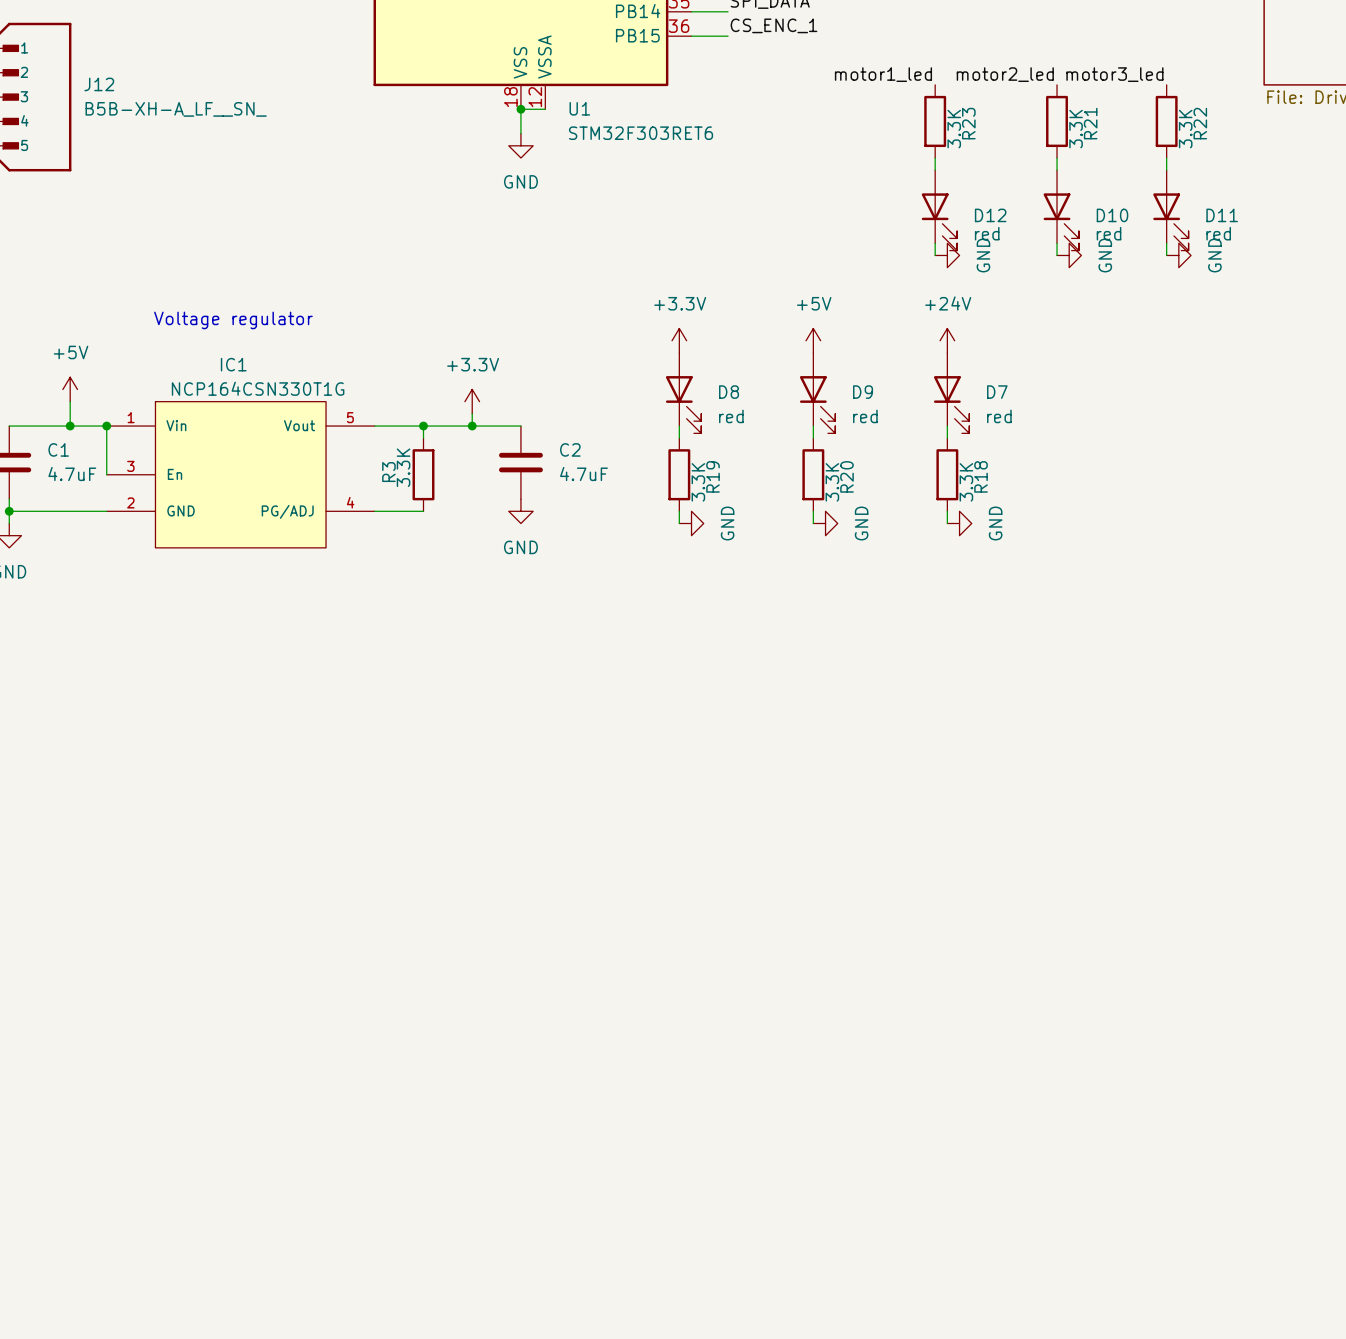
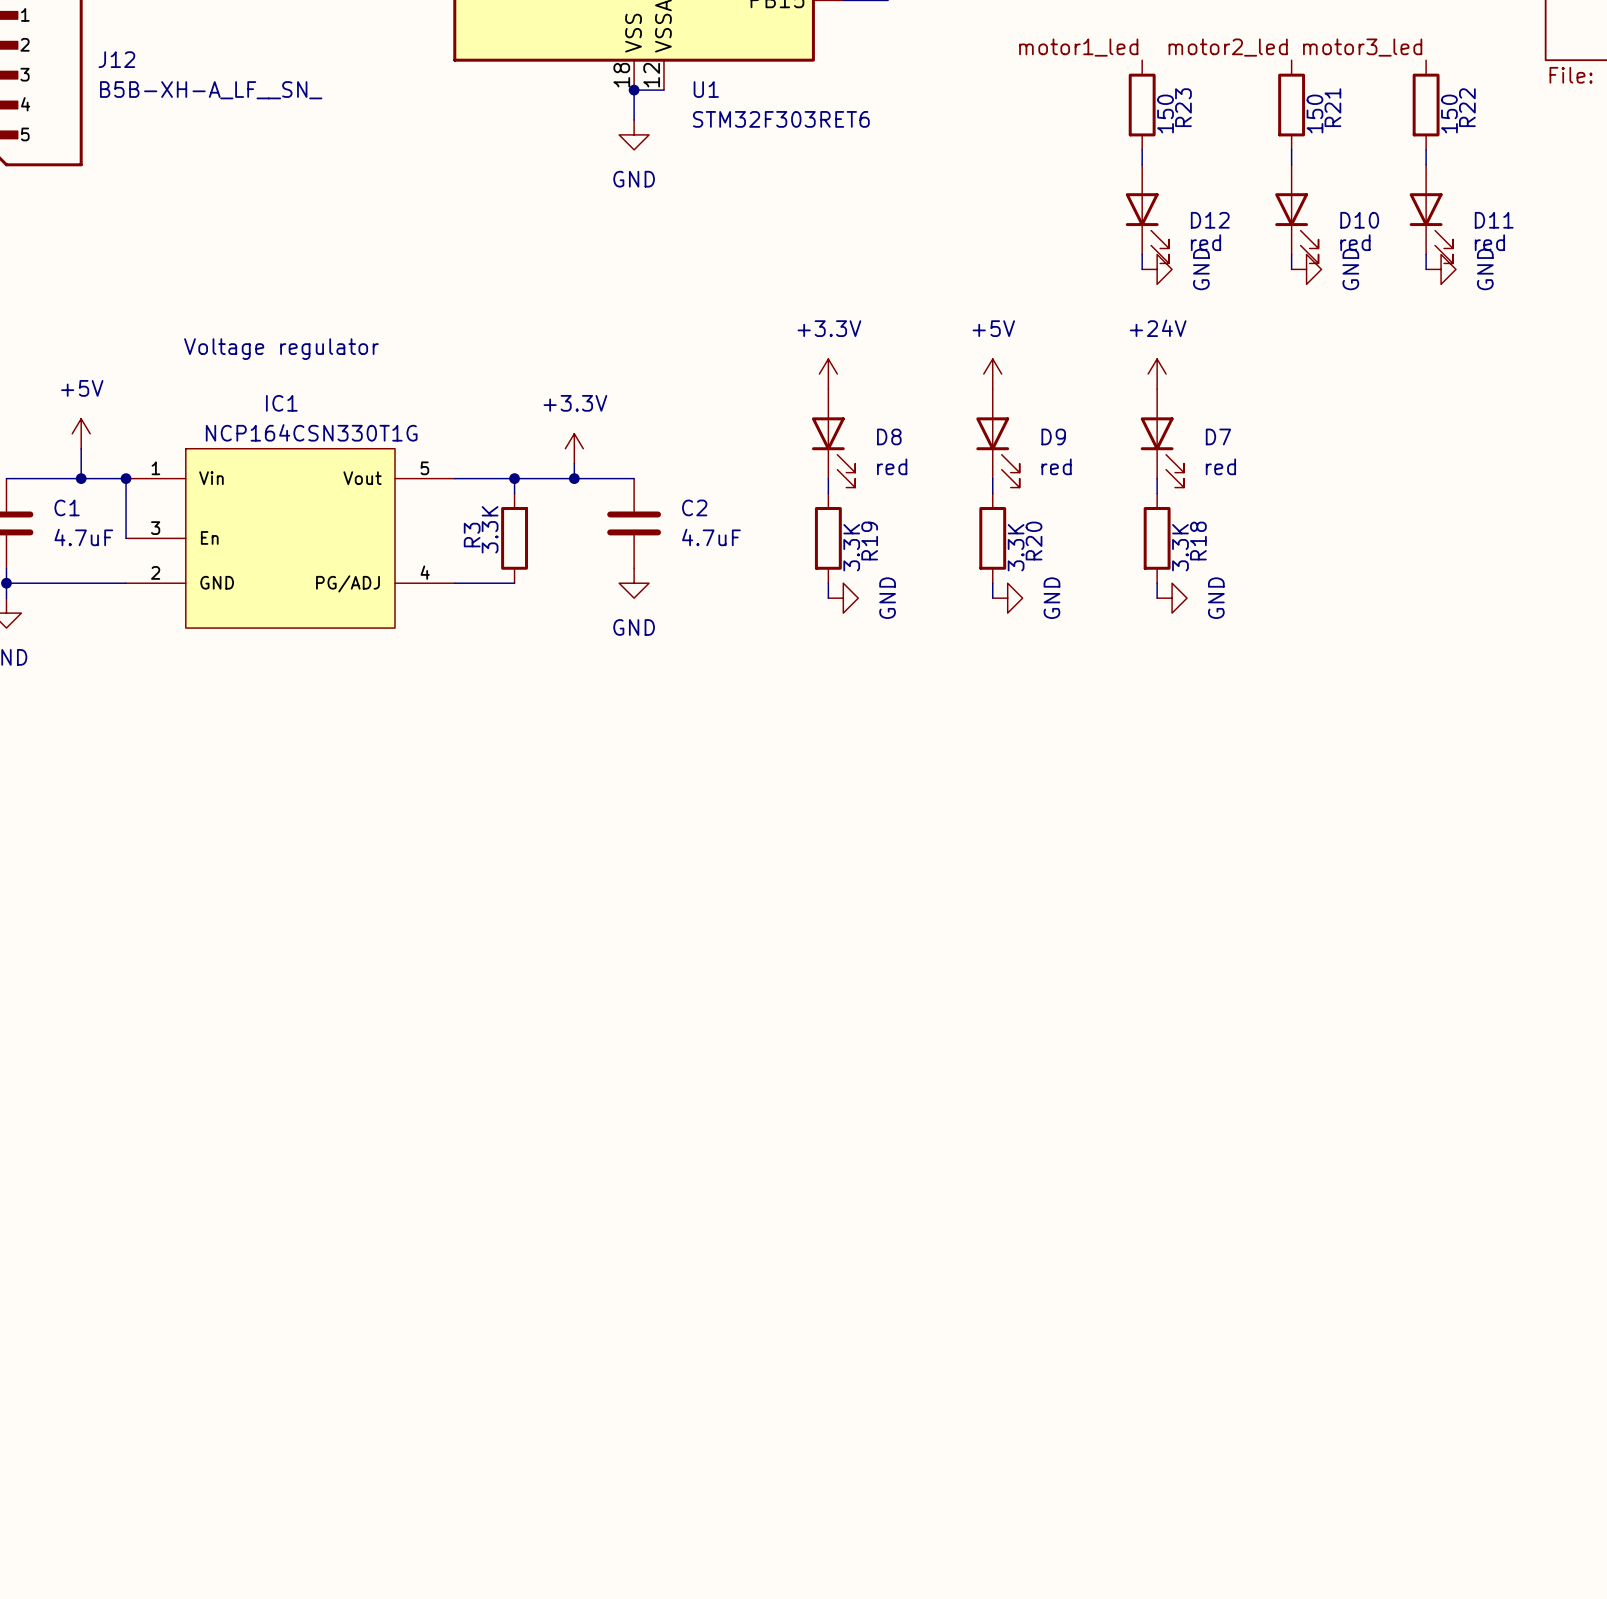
R23 value: 3.3K (954, 129) -> 150 (1165, 113)
R21 value: 3.3K (1076, 129) -> 150 (1314, 113)
R22 value: 3.3K (1185, 129) -> 150 (1449, 113)

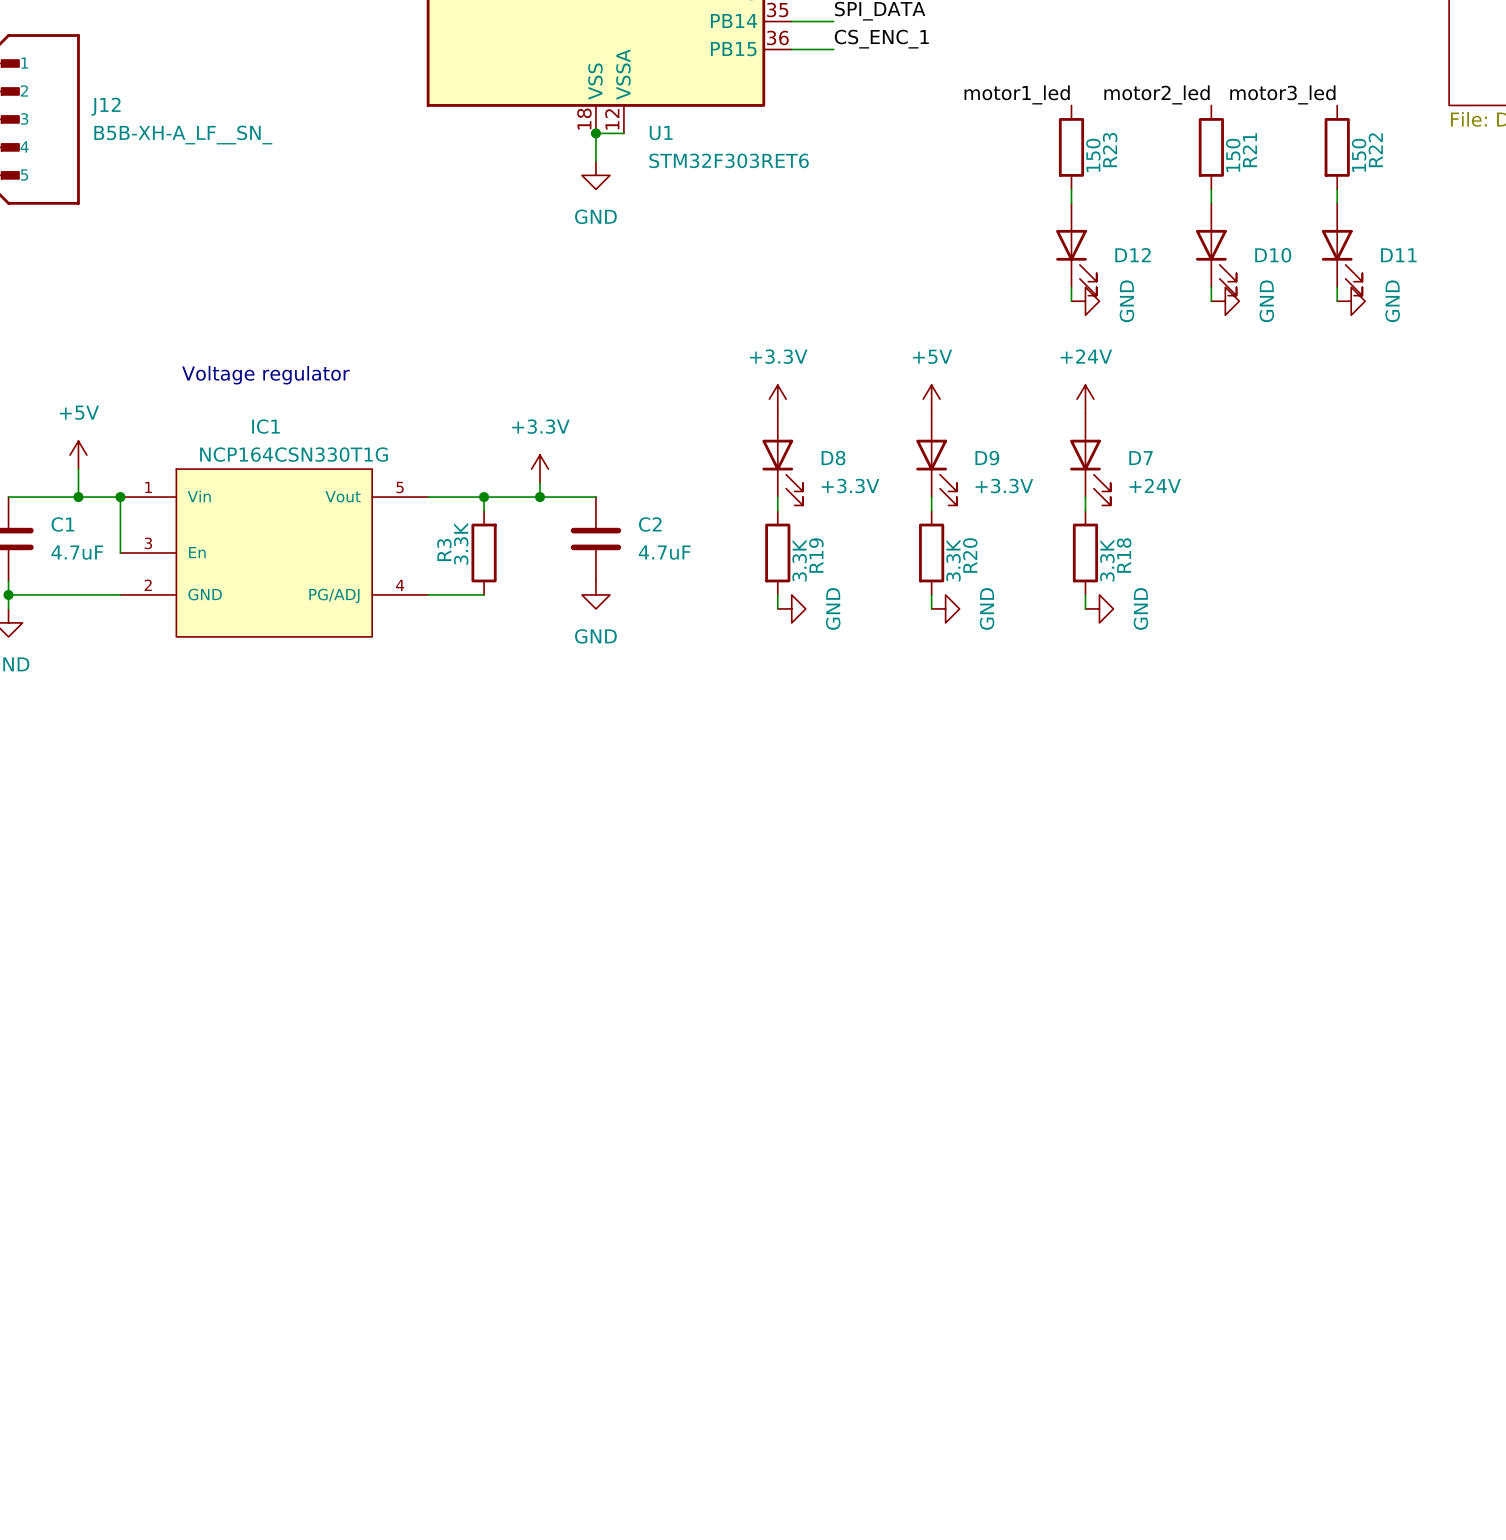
D12 value: red (1205, 242) -> none
D10 value: red (1355, 242) -> none
D11 value: red (1489, 242) -> none
D8 value: red (892, 466) -> +3.3V (850, 486)
D9 value: red (1056, 466) -> +3.3V (1004, 486)
D7 value: red (1220, 466) -> +24V (1155, 485)

